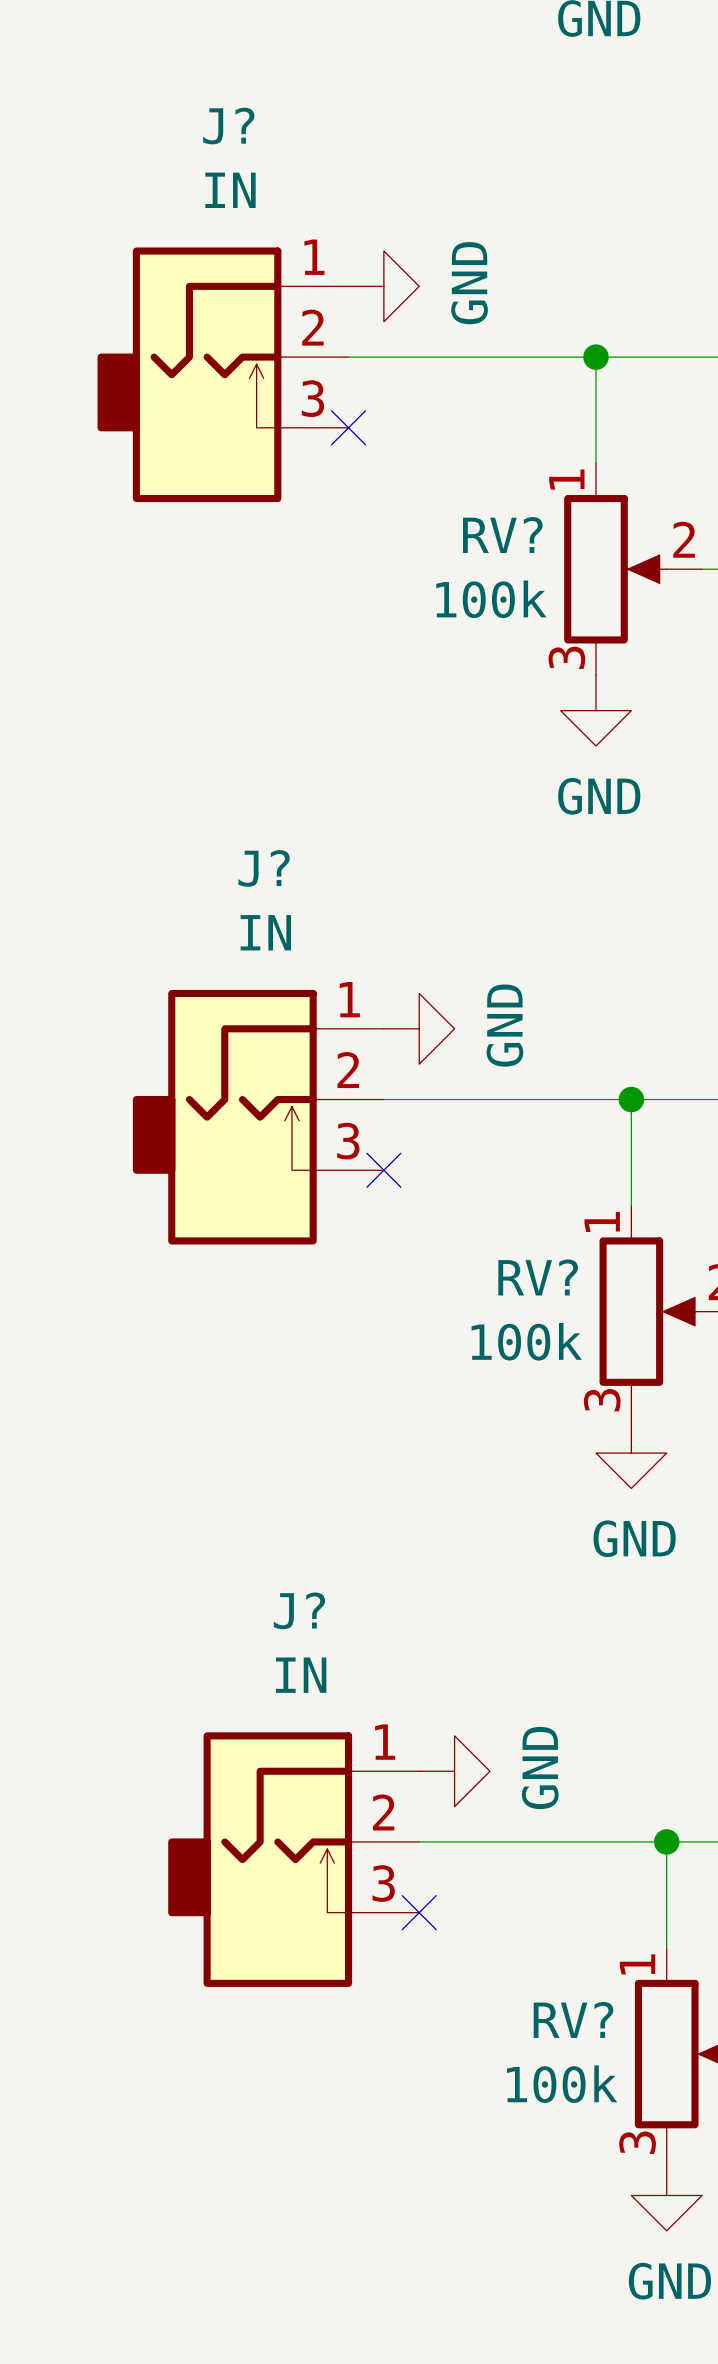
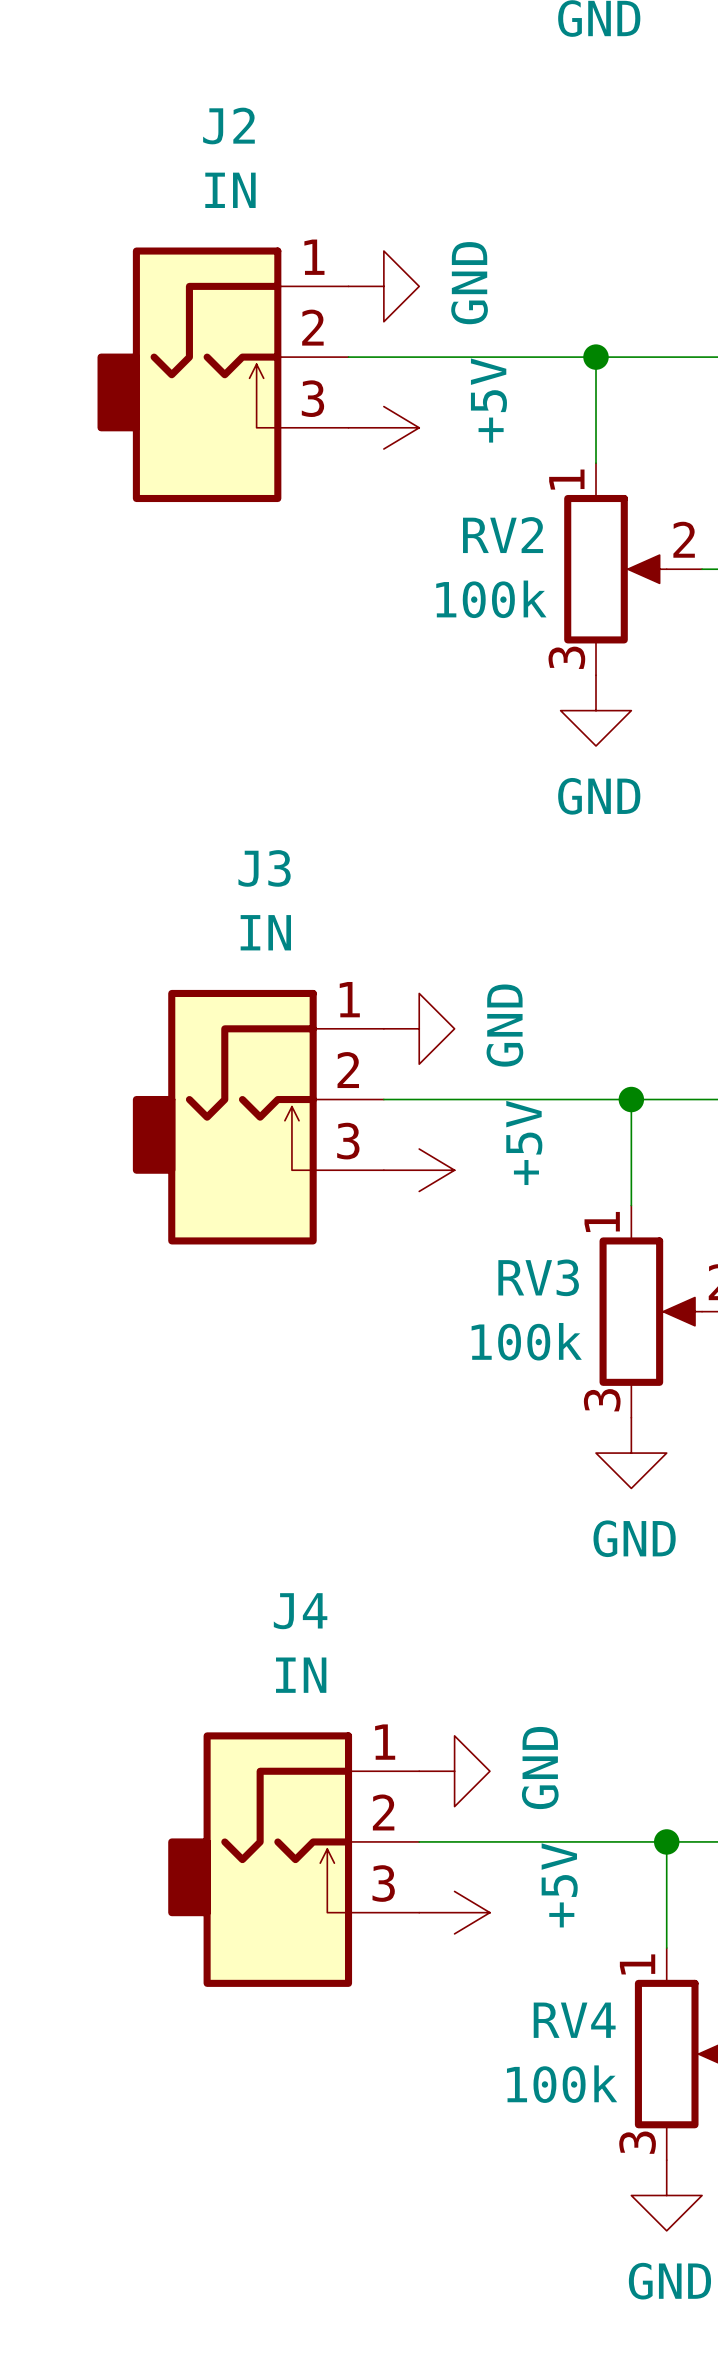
J? name: J? (228, 126) -> J2 (228, 126)
no-connect mark: (348, 427) -> none
power symbol: none -> +5V (383, 427)
RV? name: RV? (502, 535) -> RV2 (503, 535)
J? name: J? (264, 868) -> J3 (264, 868)
no-connect mark: (383, 1170) -> none
power symbol: none -> +5V (419, 1170)
RV? name: RV? (538, 1277) -> RV3 (538, 1277)
J? name: J? (299, 1610) -> J4 (300, 1611)
no-connect mark: (419, 1912) -> none
power symbol: none -> +5V (454, 1912)
RV? name: RV? (573, 2019) -> RV4 (574, 2020)

